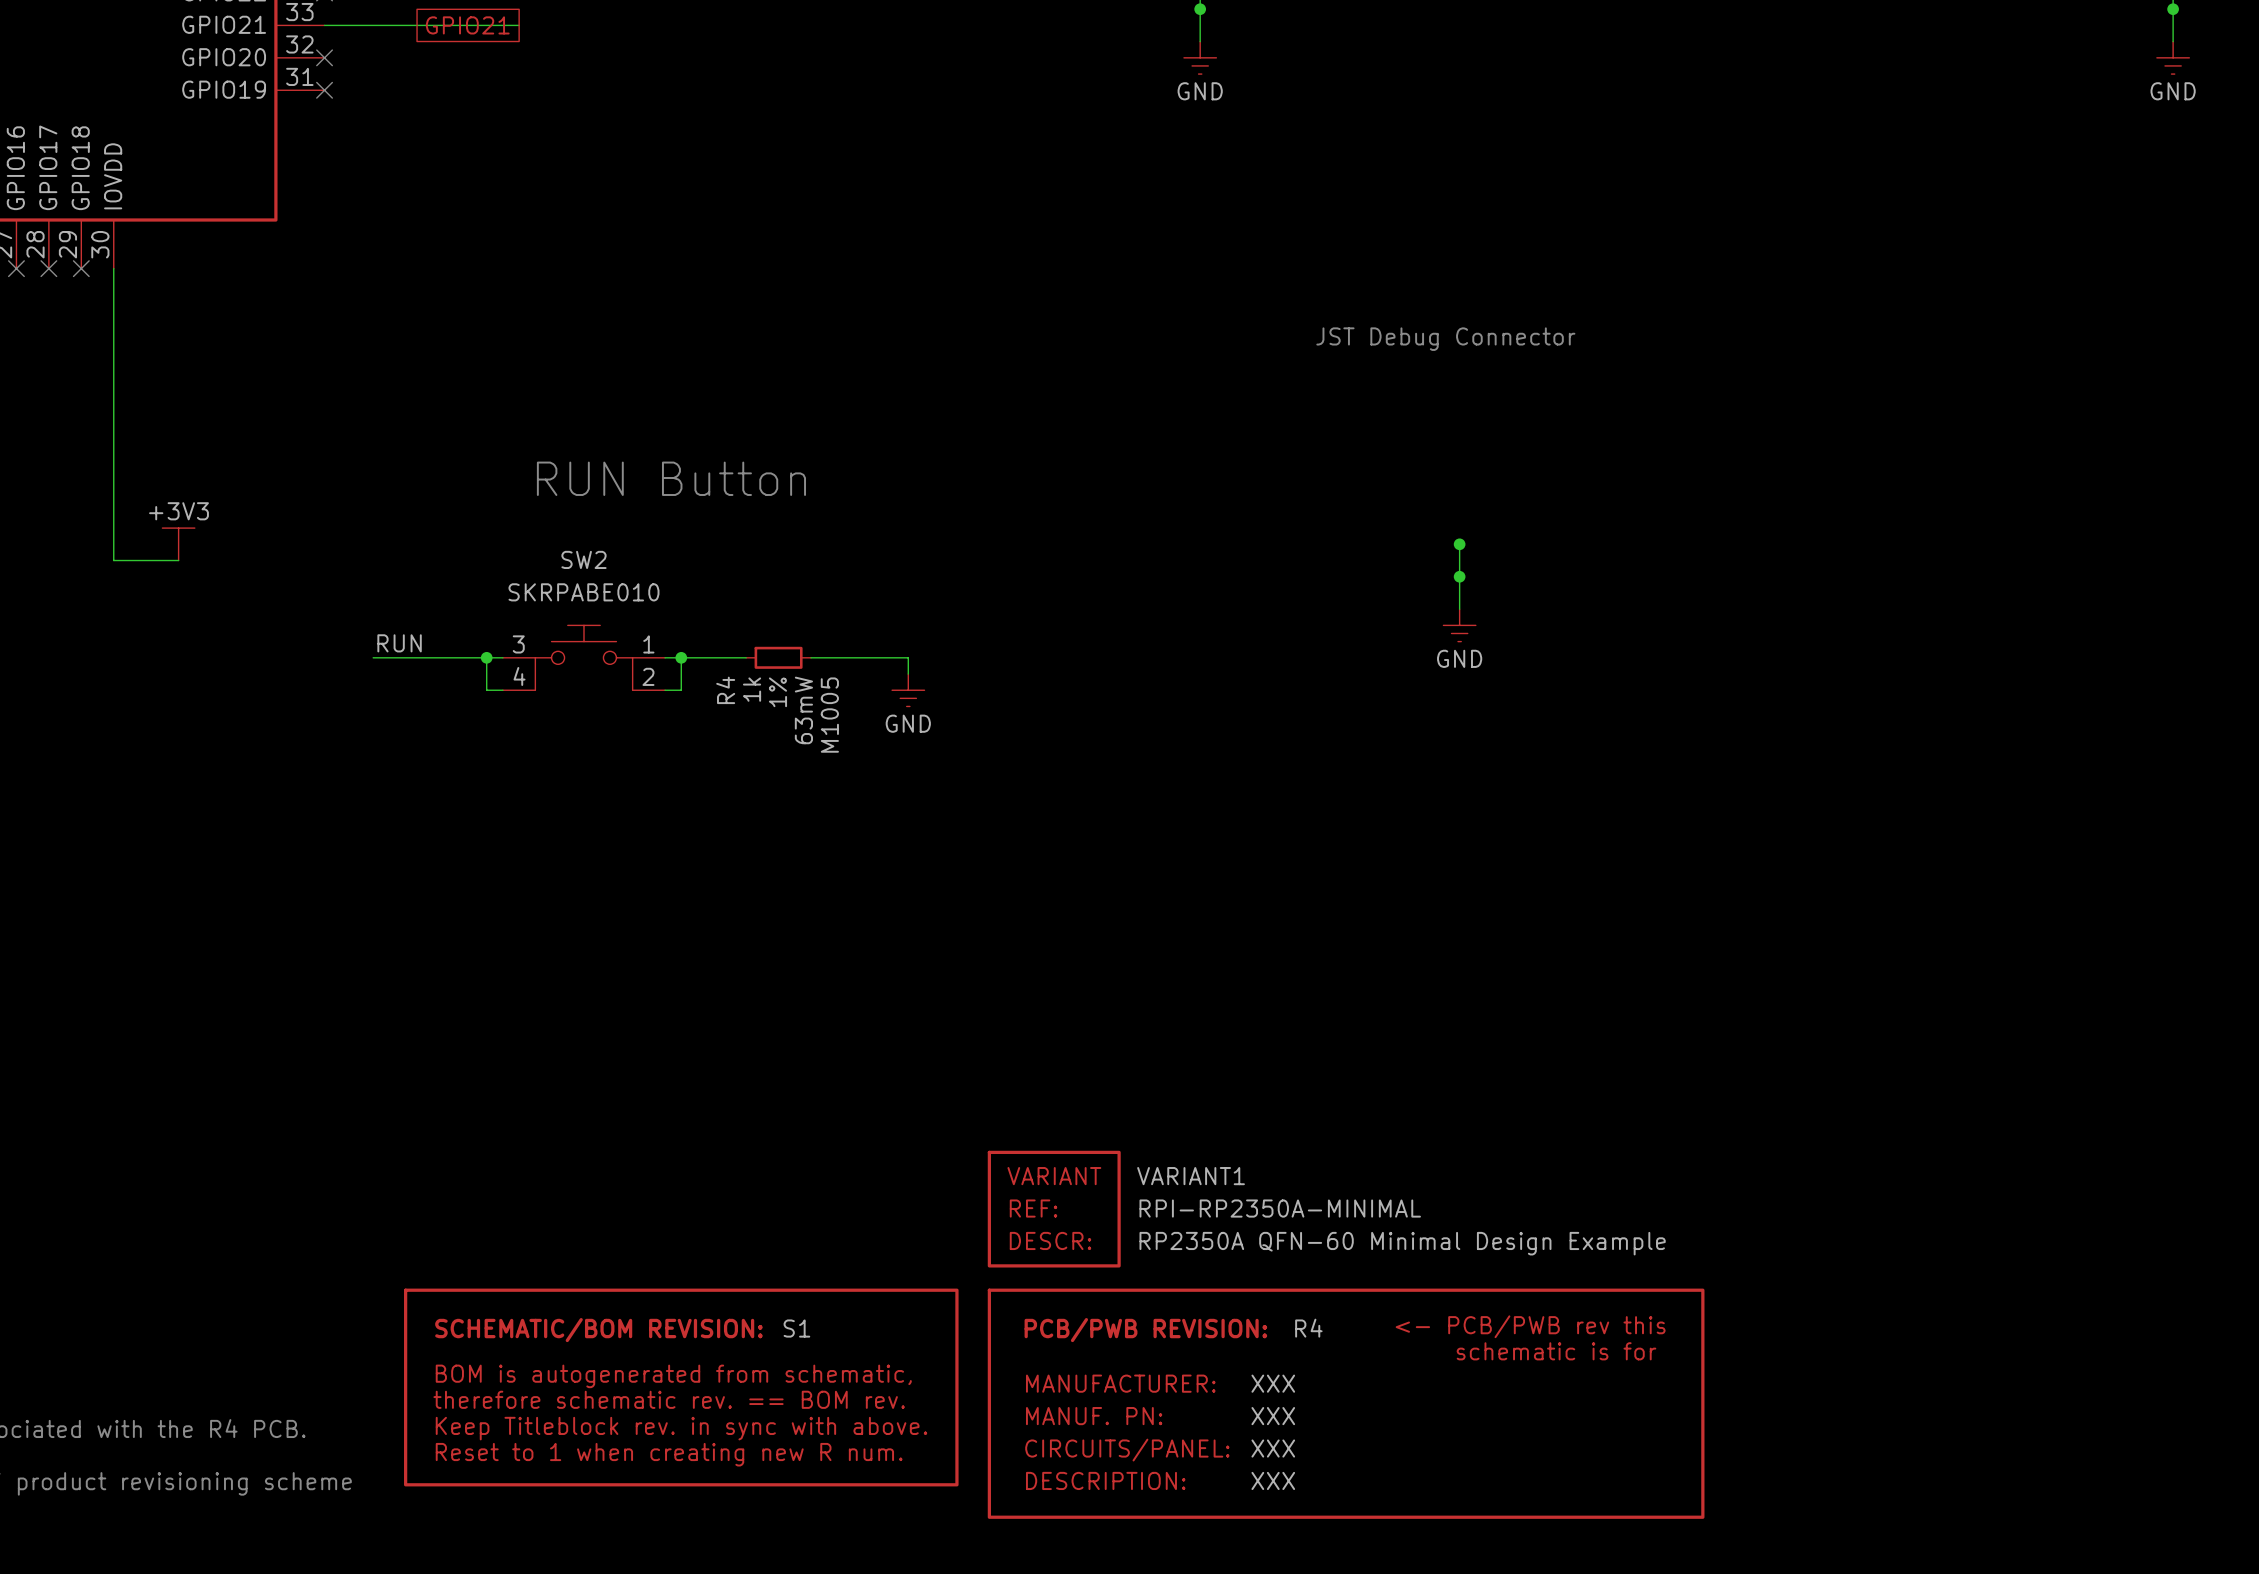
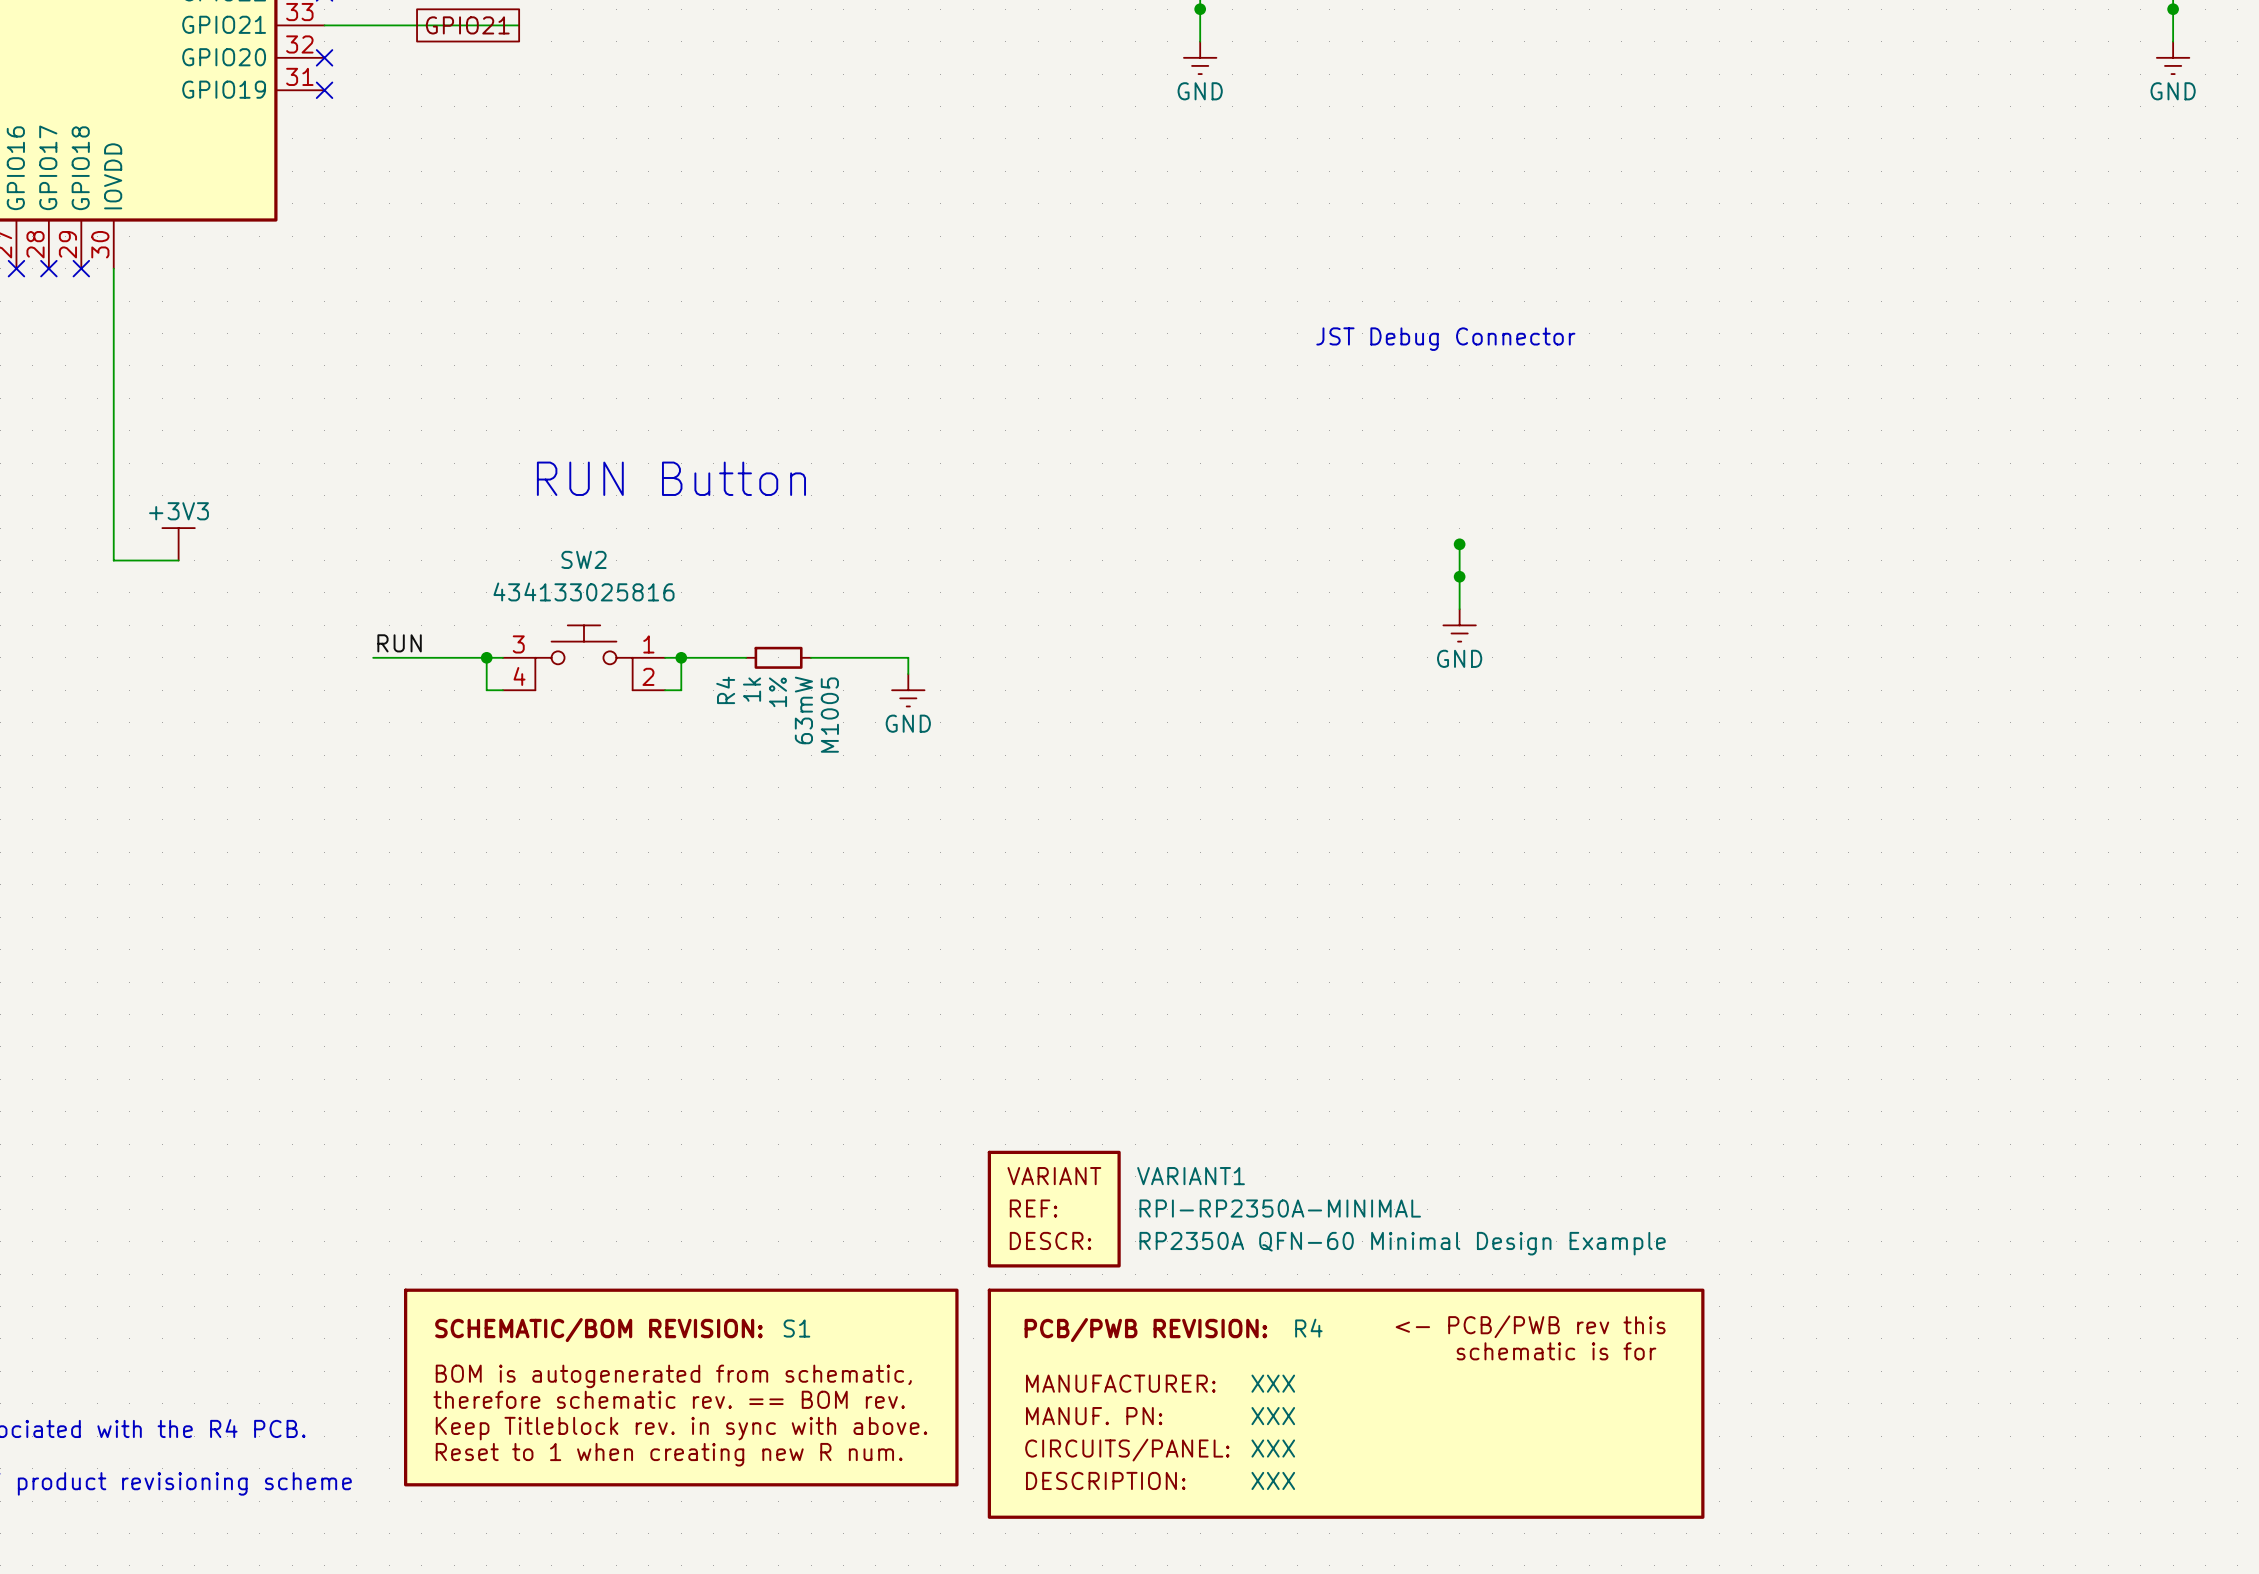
SW2 value: SKRPABE010 (583, 592) -> 434133025816 (583, 591)

